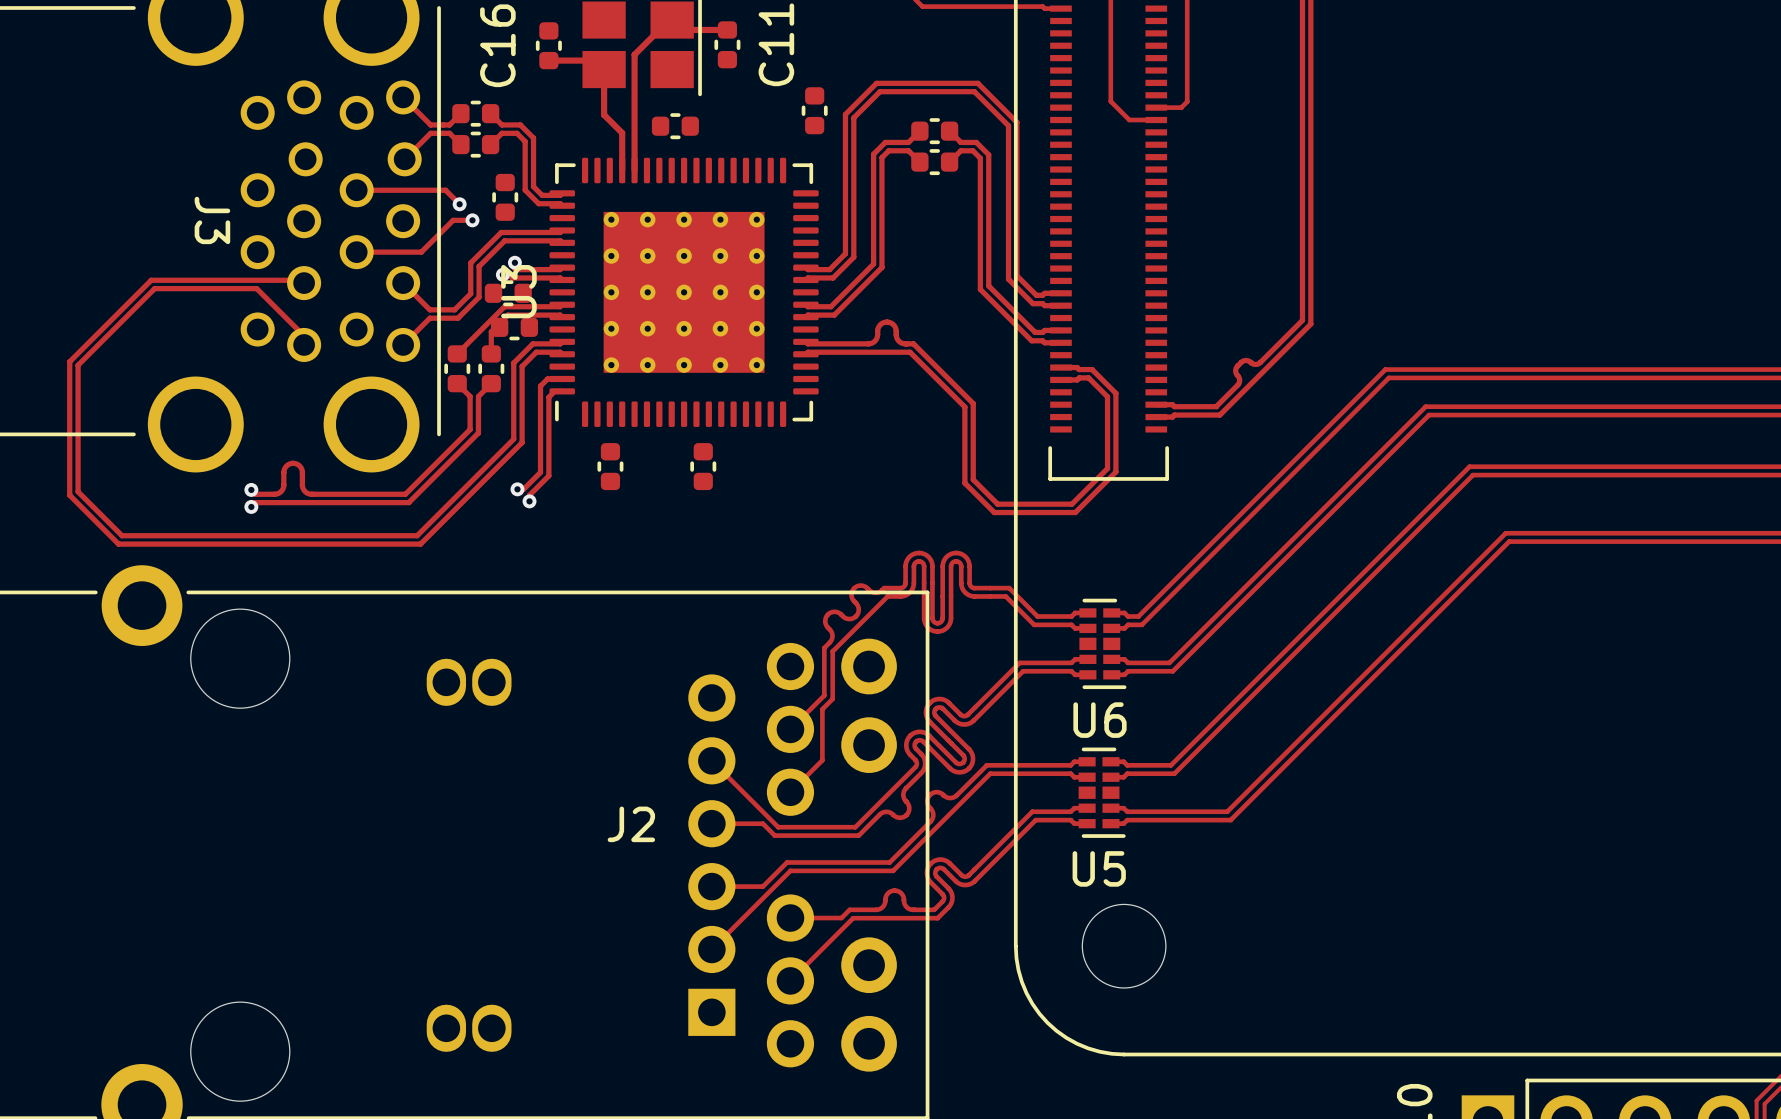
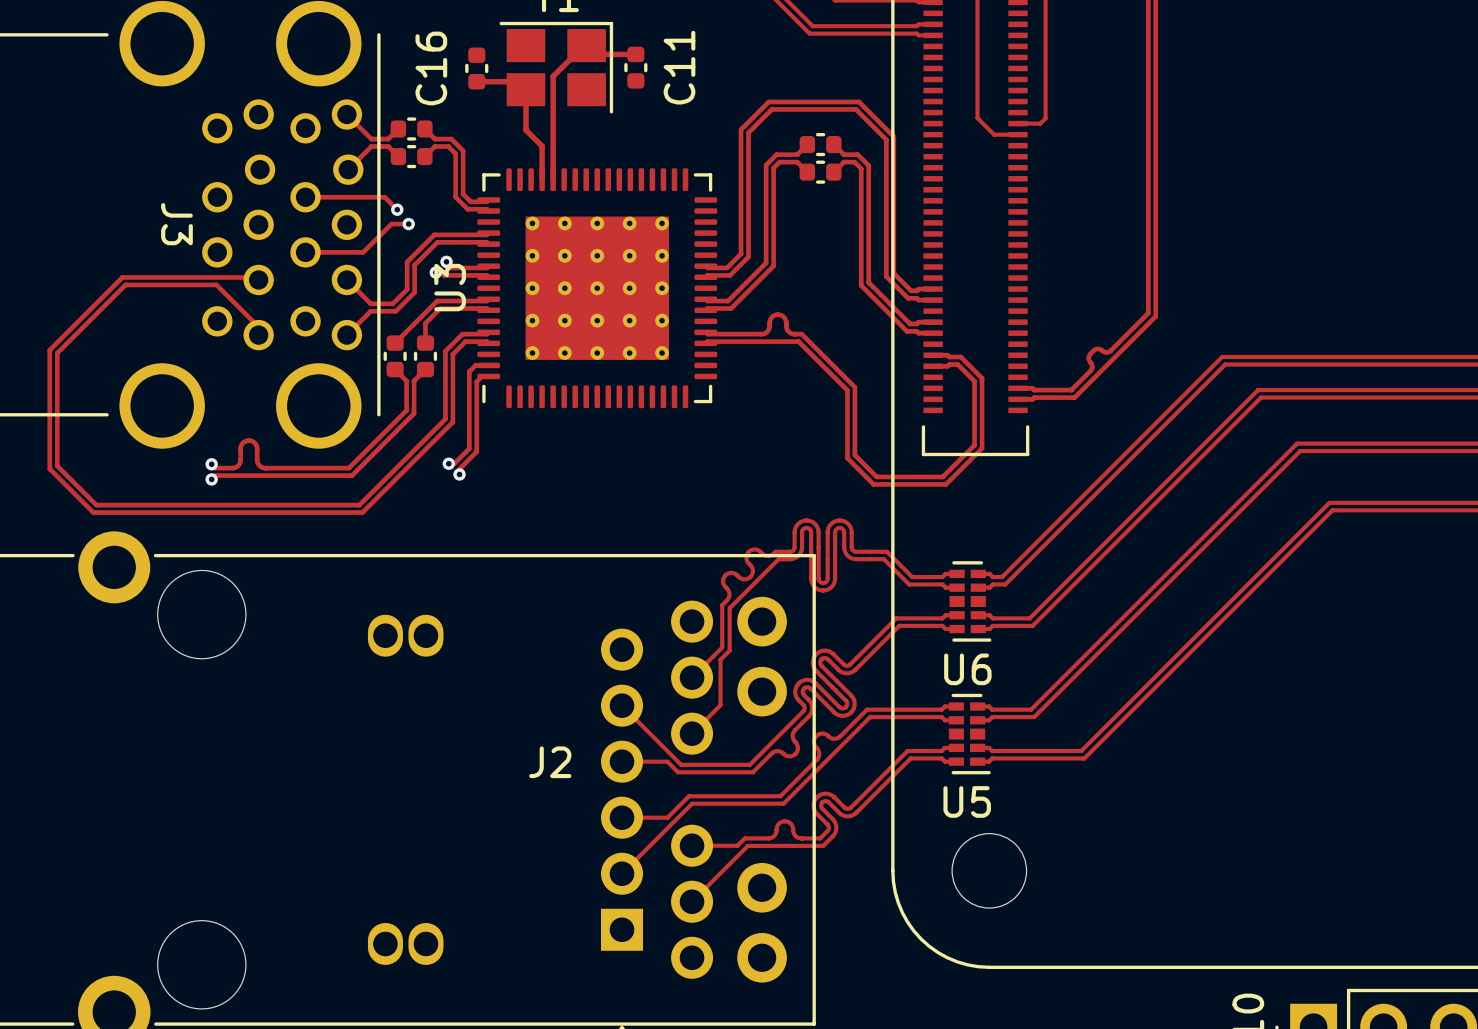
part: (814, 110) -> none
part: (675, 126) -> none
part: (505, 197) -> none
part: (508, 293) -> none
part: (514, 327) -> none
part: (610, 466) -> none
part: (703, 466) -> none

